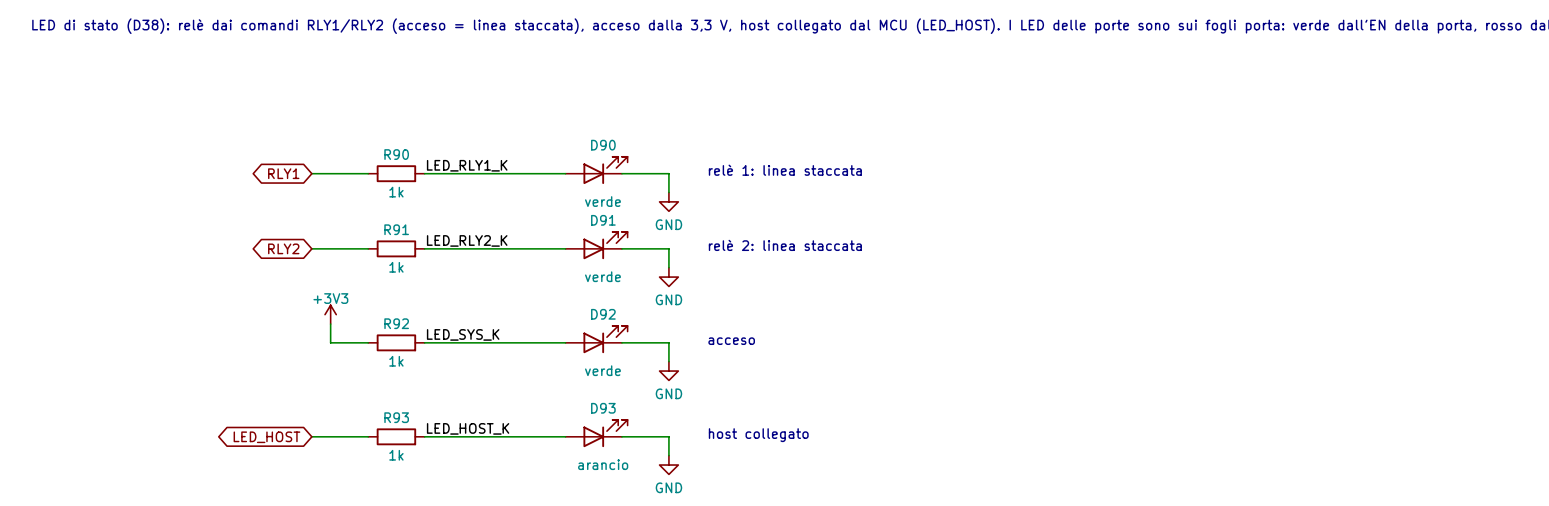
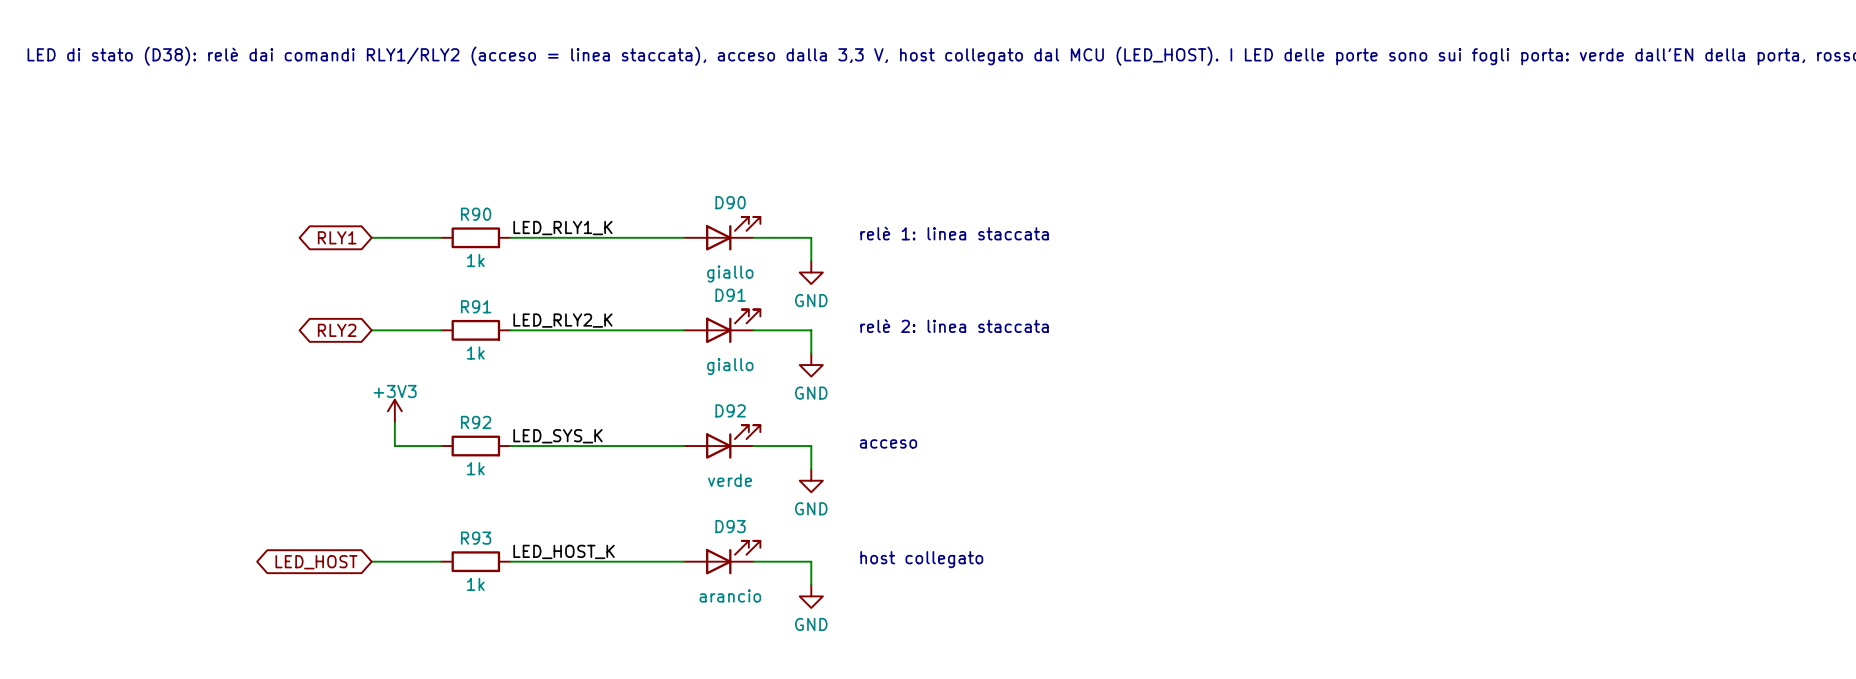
D90 value: verde (602, 201) -> giallo (730, 274)
D91 value: verde (602, 276) -> giallo (730, 366)

